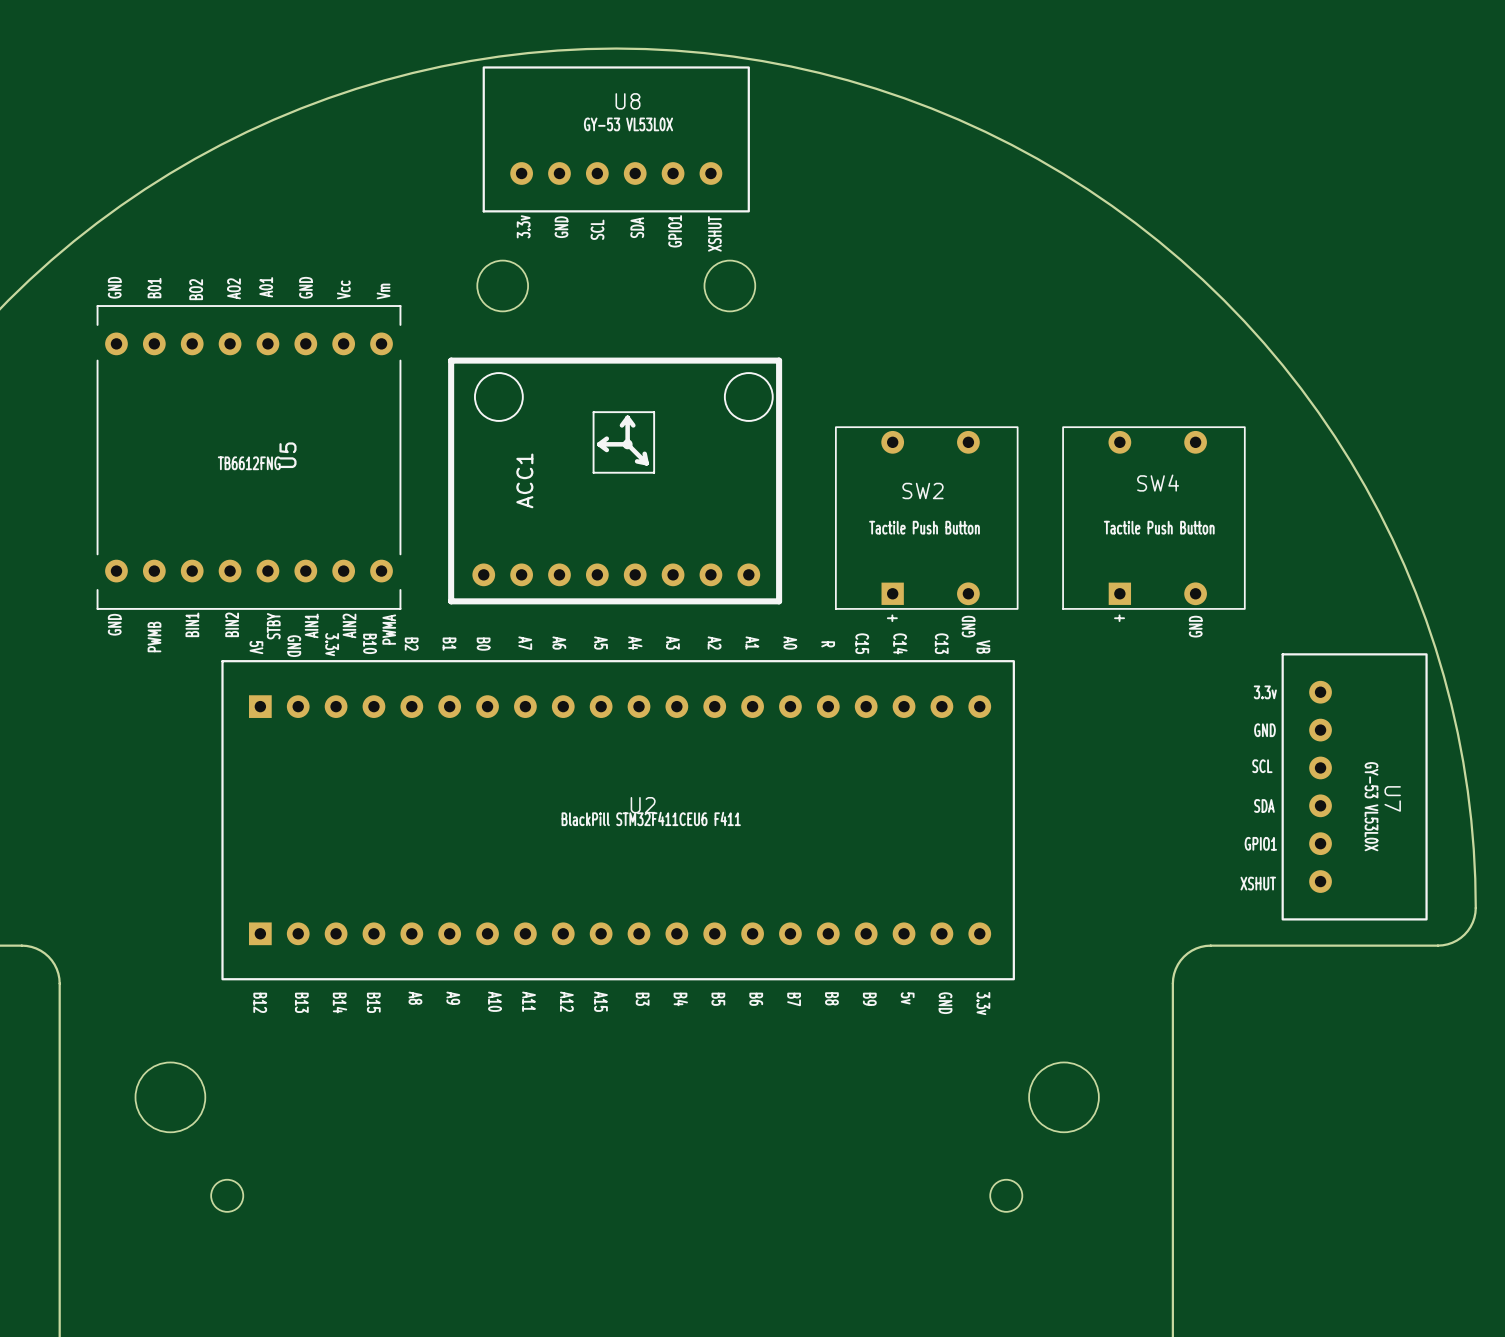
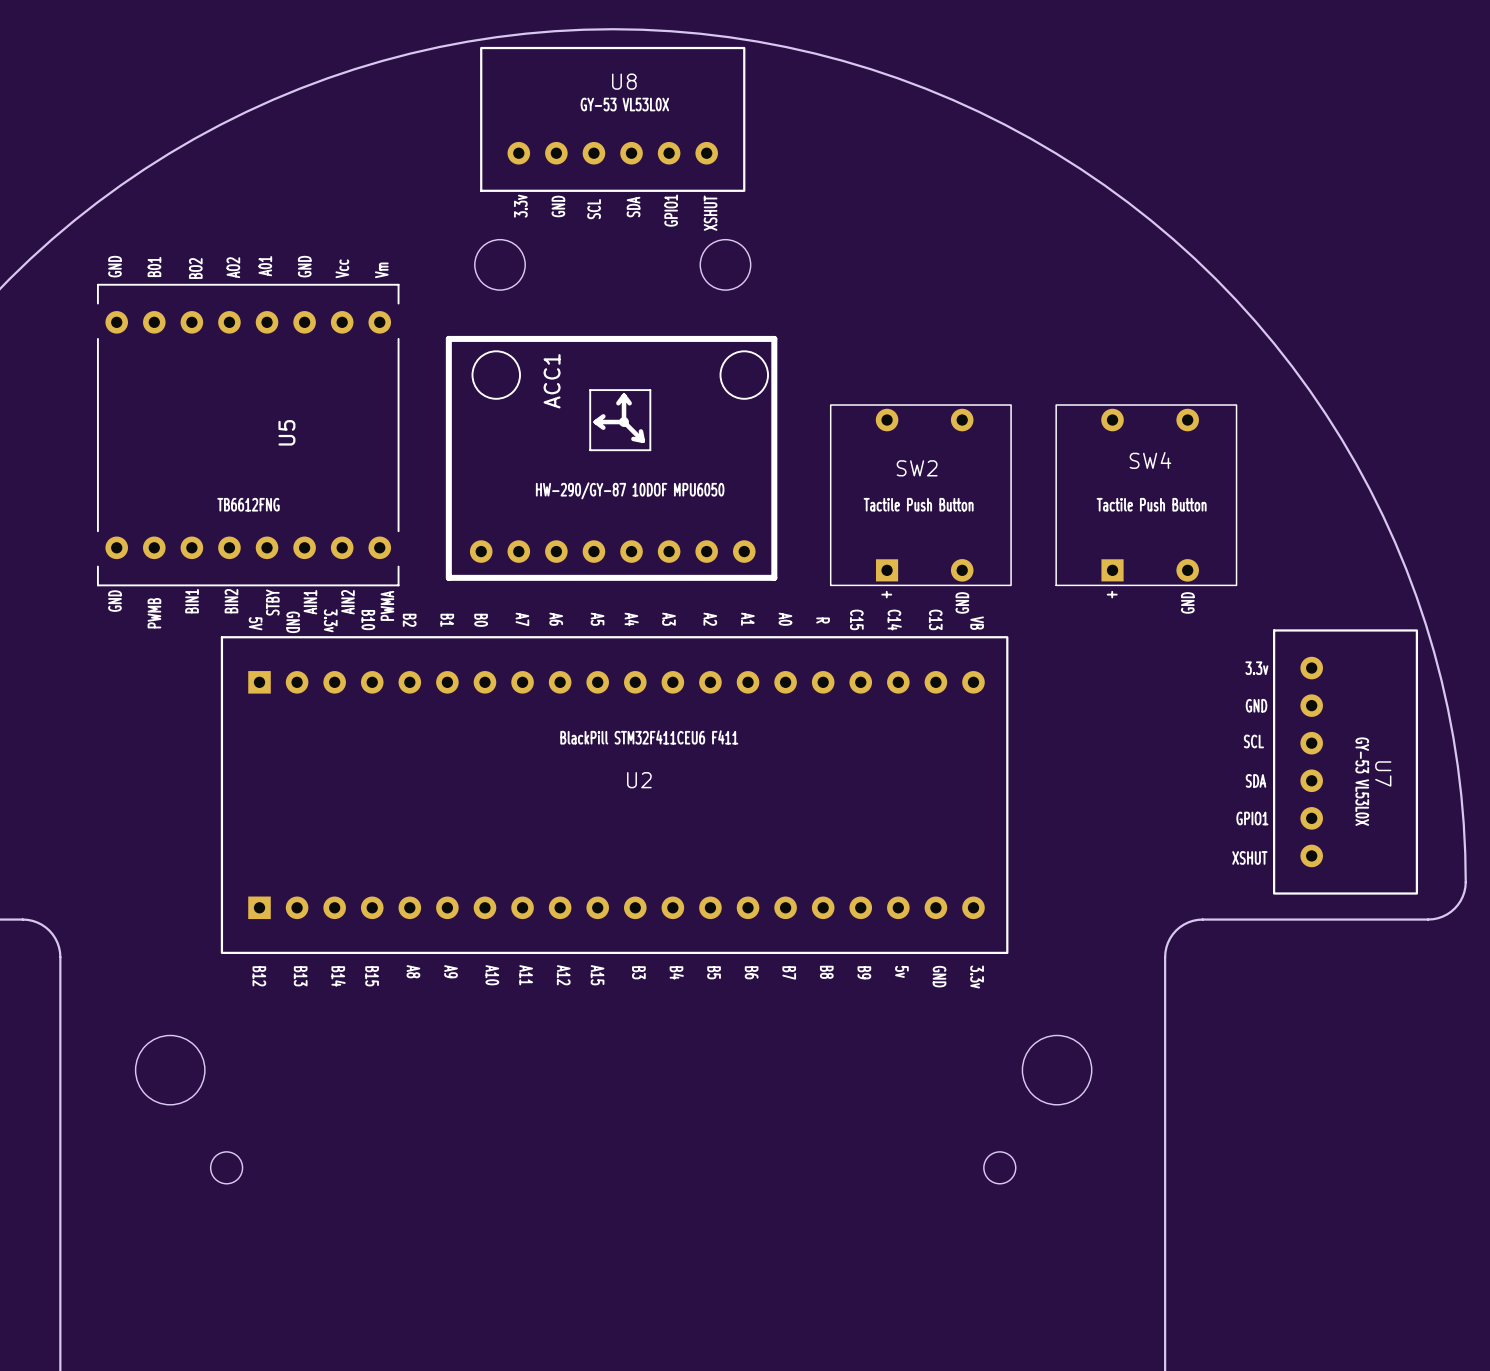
text position: TB6612FNG (249, 463) -> TB6612FNG (248, 504)
ACC1 name position: ACC1 (524, 480) -> ACC1 (552, 381)
text: none -> HW-290/GY-87 10DOF MPU6050 (630, 490)
text position: BlackPill STM32F411CEU6 F411 (651, 818) -> BlackPill STM32F411CEU6 F411 (649, 737)

